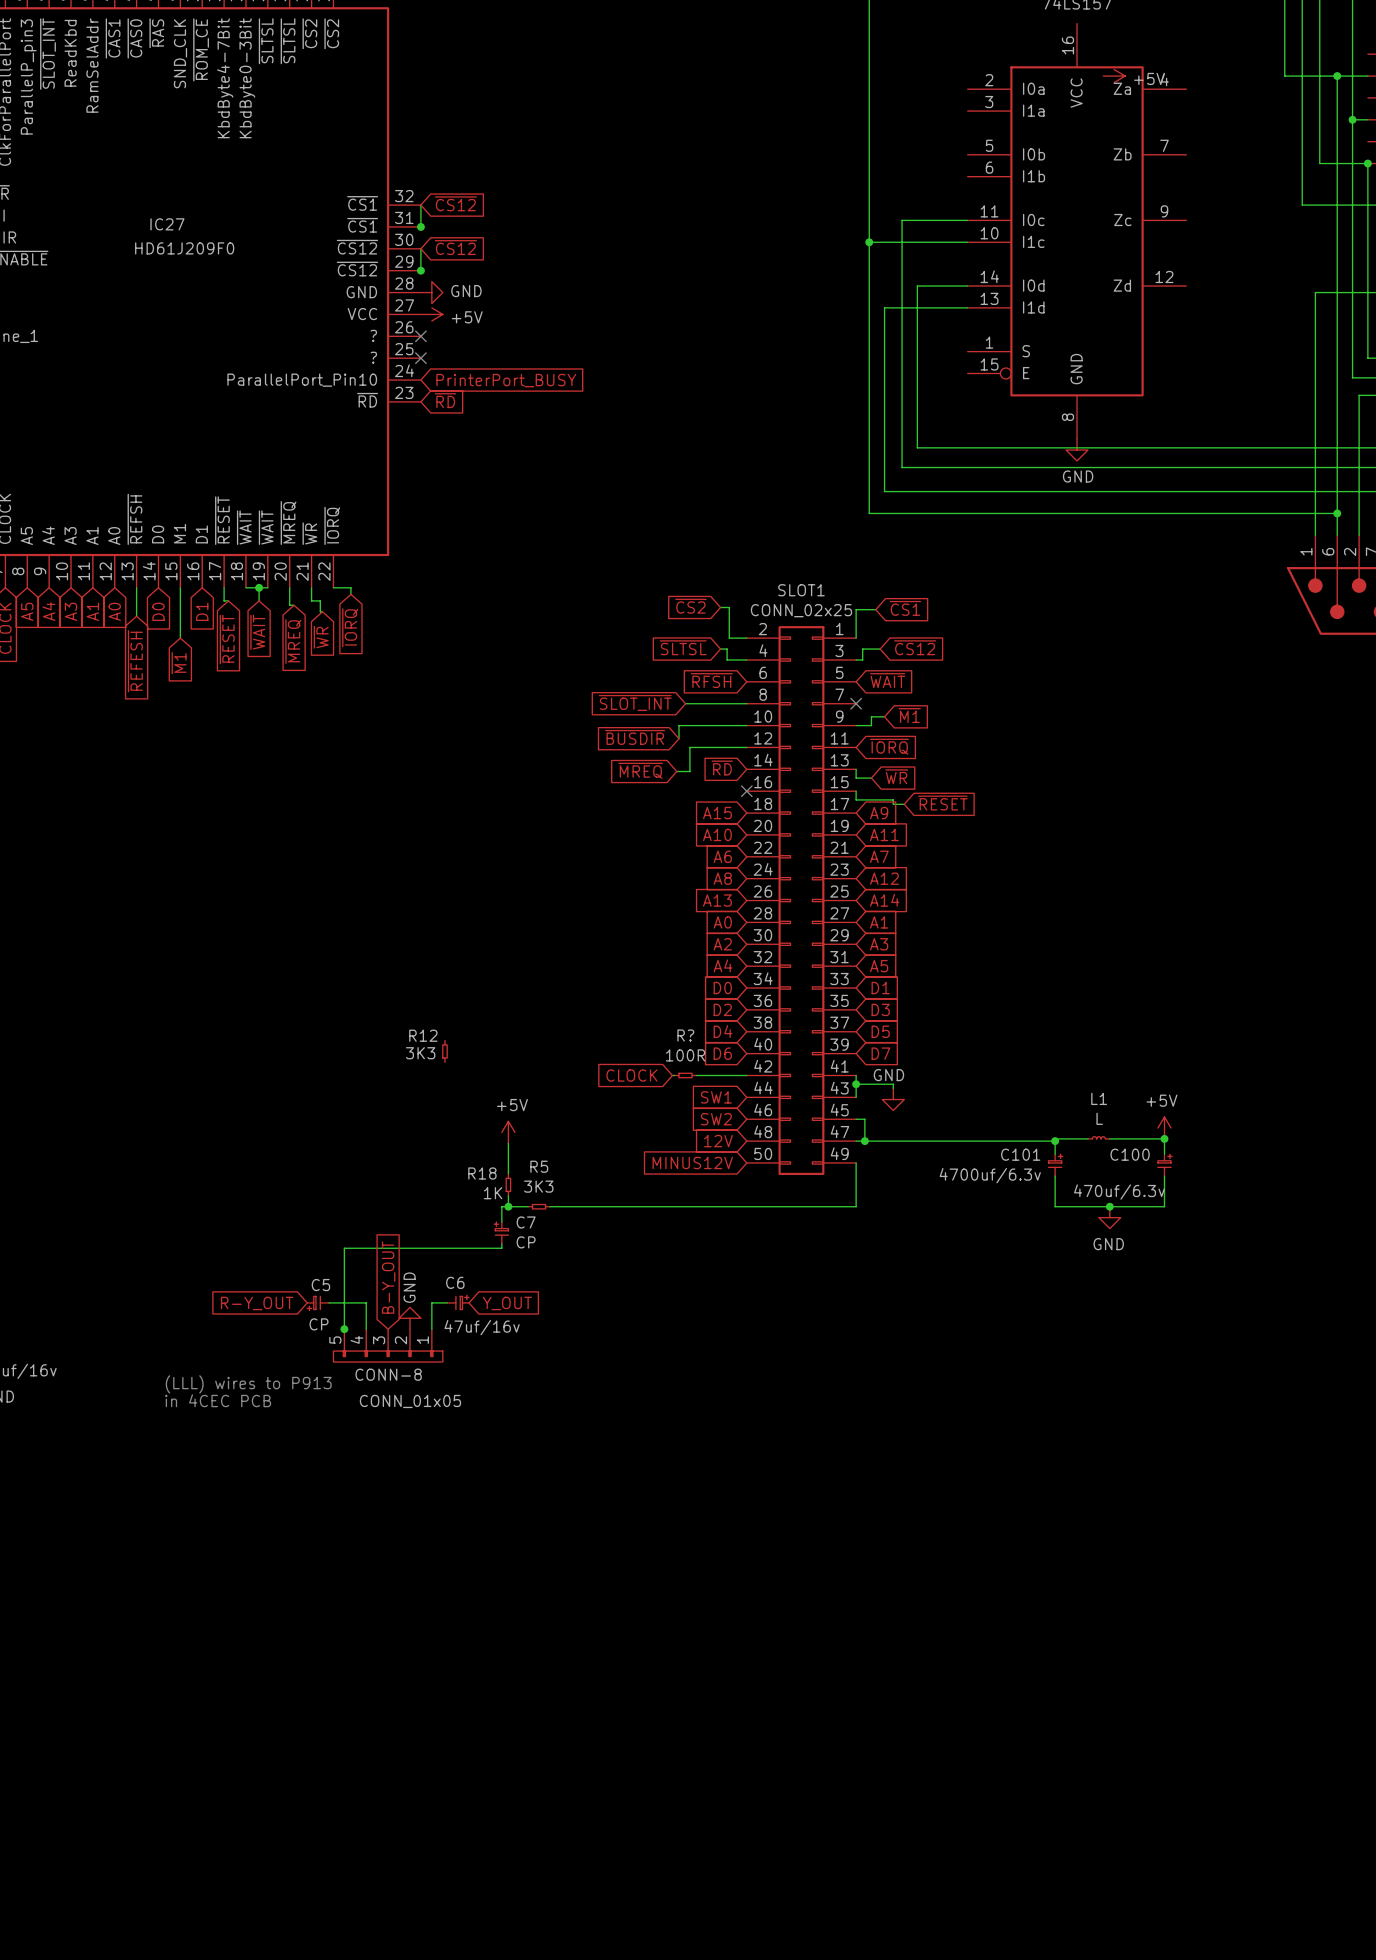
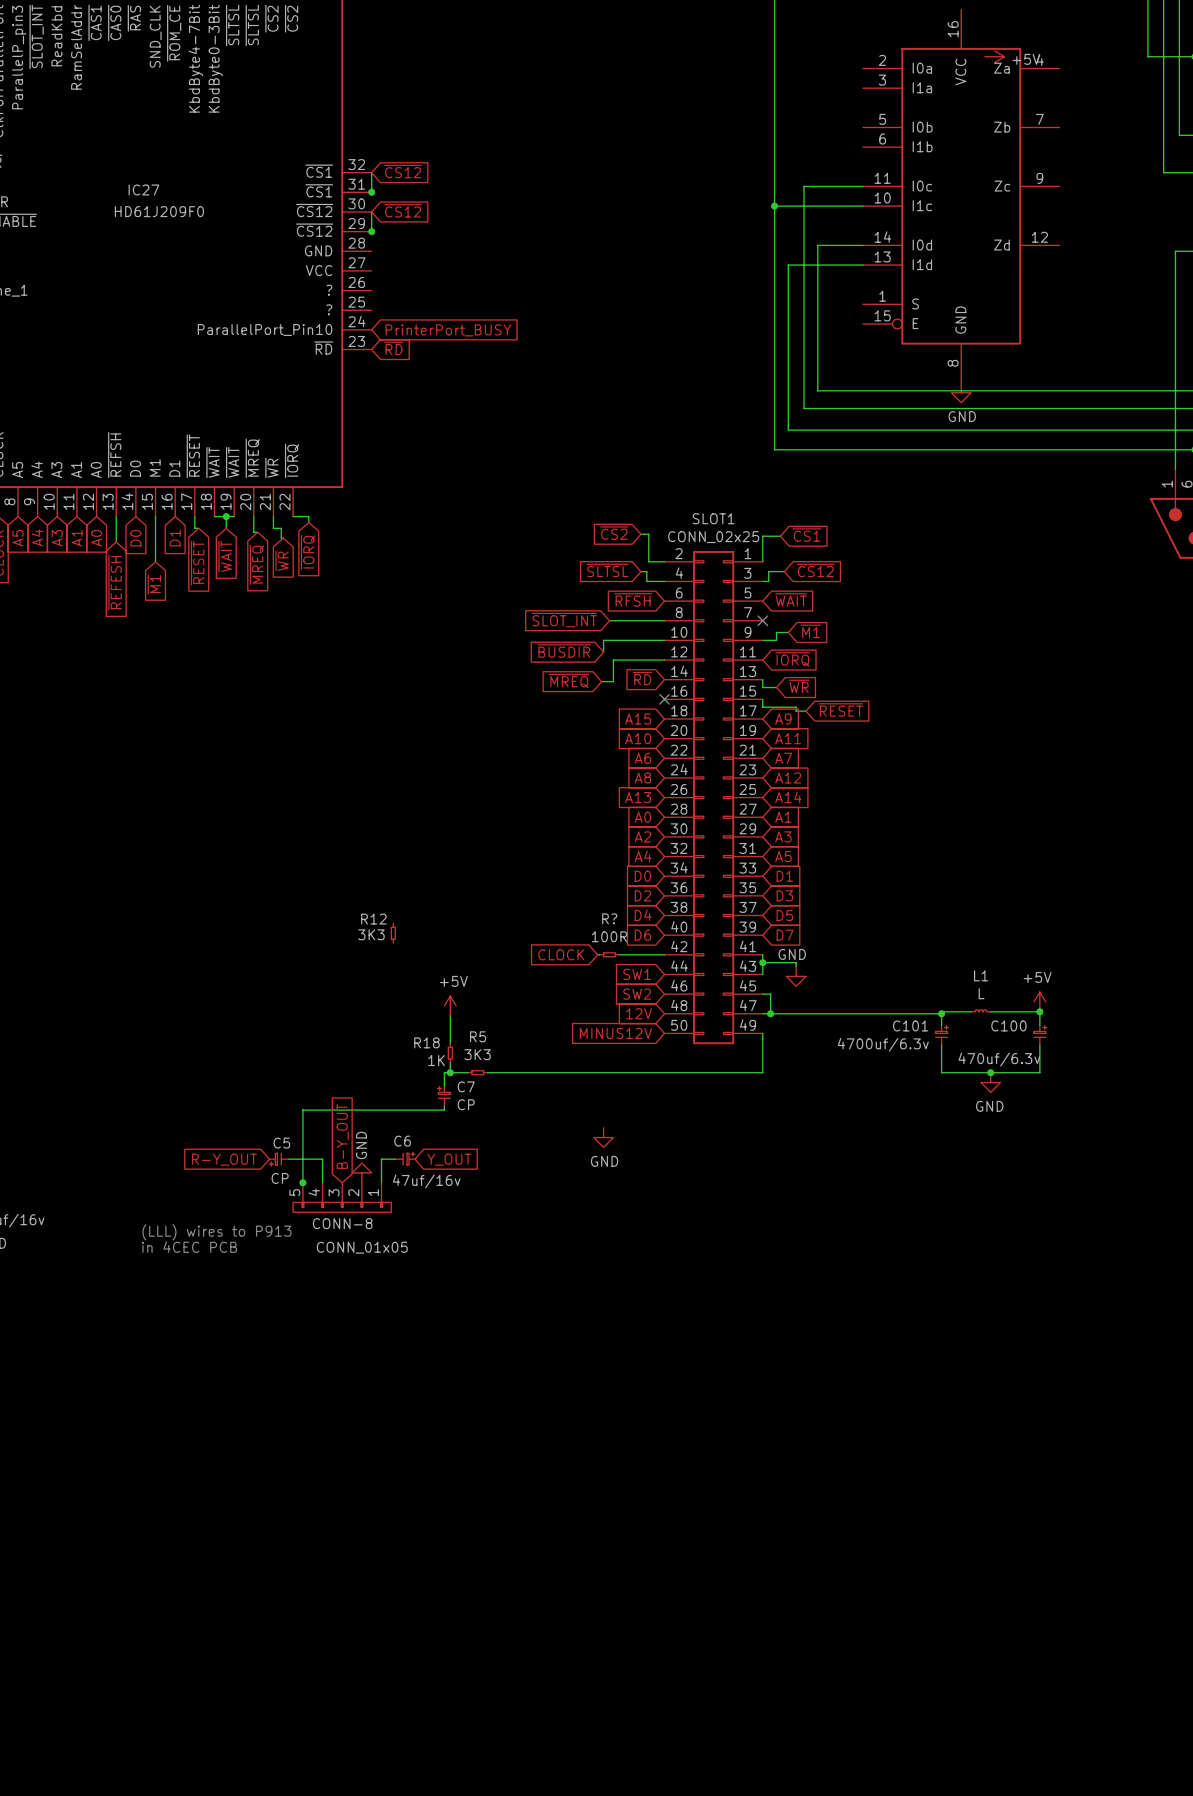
power symbol: GND (431, 292) -> none
power symbol: +5V (431, 314) -> none
no-connect mark: (420, 336) -> none
no-connect mark: (420, 358) -> none
power symbol: none -> GND (603, 1137)

